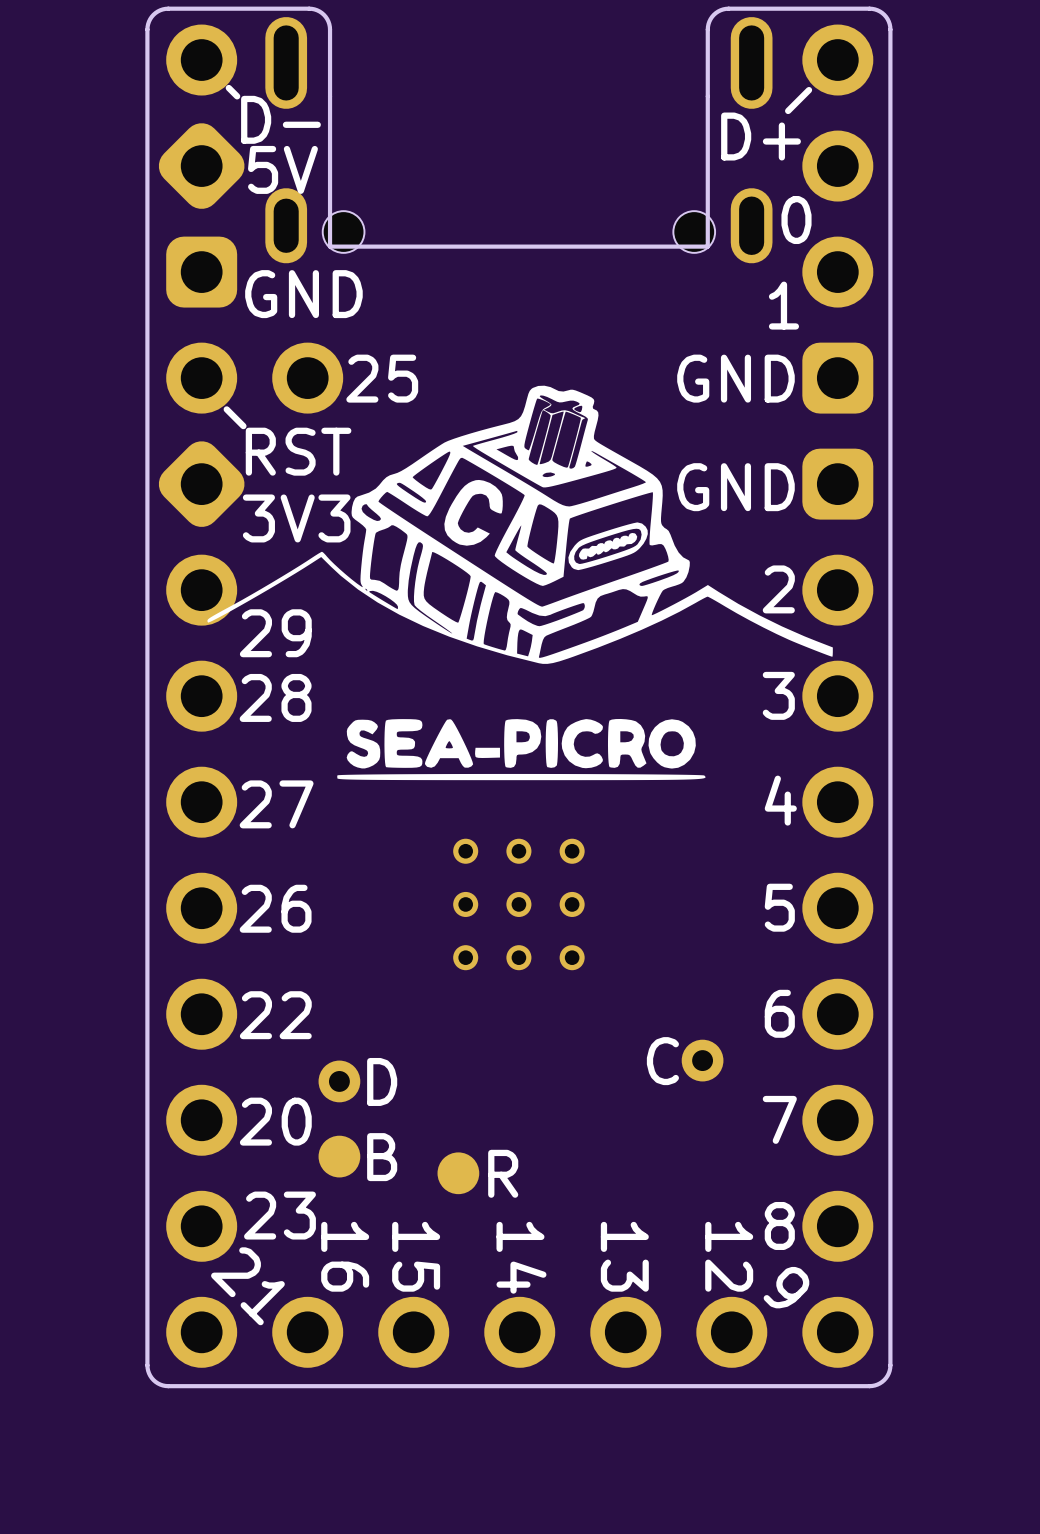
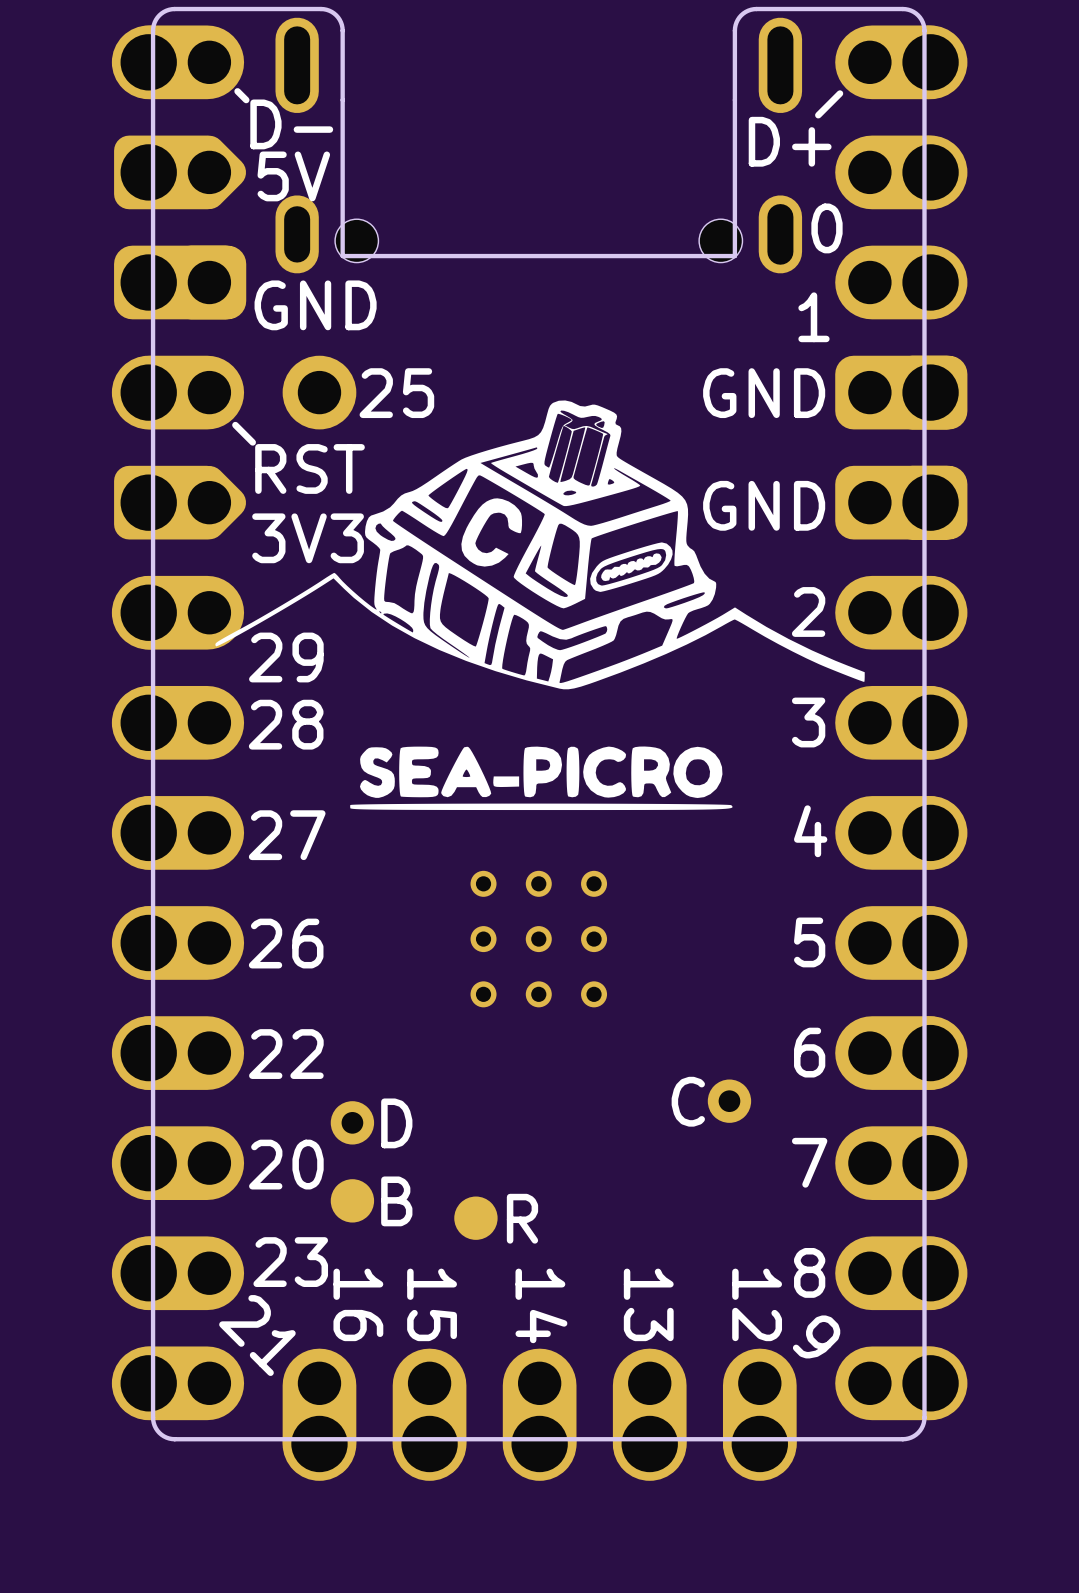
part footprint: [158, 24, 874, 1368] -> [111, 25, 968, 1481]

